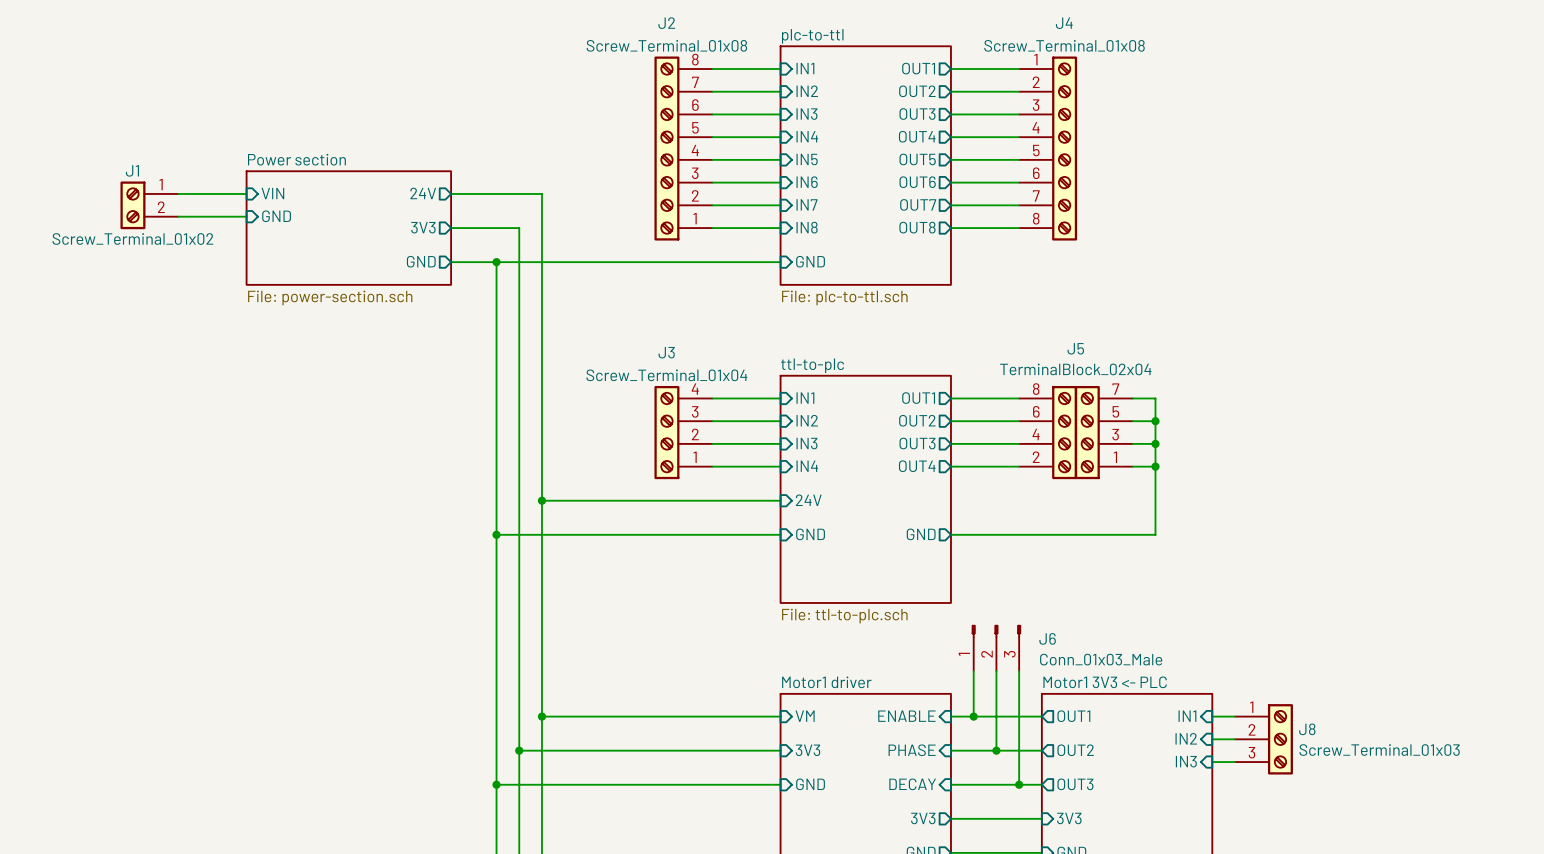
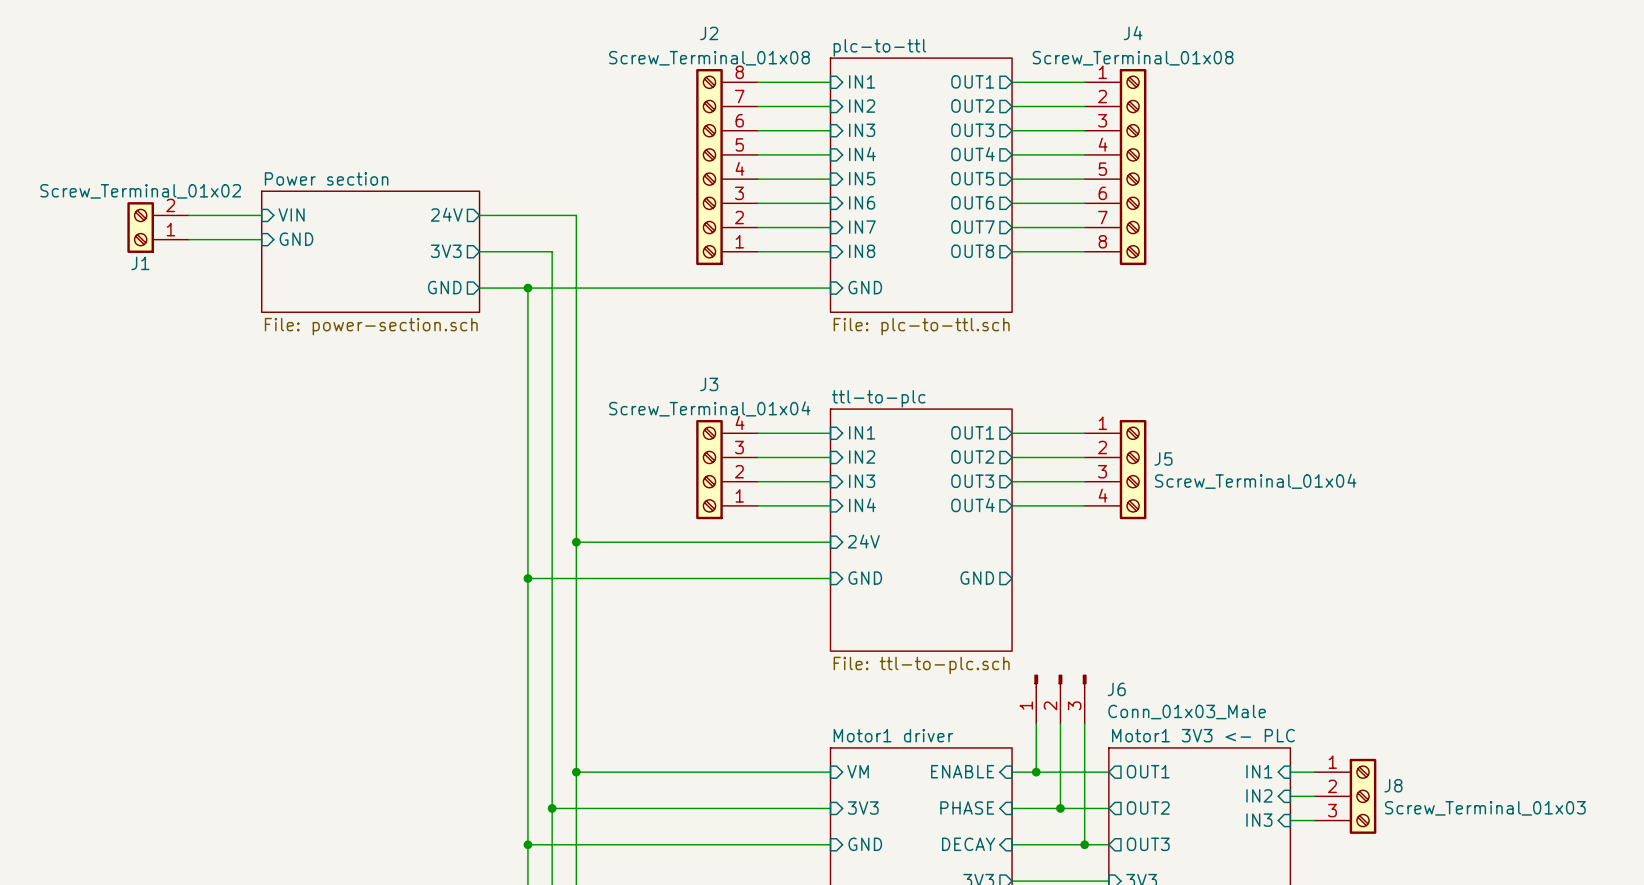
J1 flip: as is (132, 205) -> up-down (140, 227)
J5 name position: J5 (1075, 348) -> J5 (1163, 458)
J5 value: TerminalBlock_02x04 (1075, 369) -> Screw_Terminal_01x04 (1255, 481)
J5 symbol: [1019, 385, 1133, 480] -> [1084, 419, 1147, 520]
wire: (1132, 398) (1155, 398) (1155, 534) (950, 534) -> none
wire: (1132, 421) (1155, 421) -> none
junction: (1155, 421) -> none
wire: (1132, 443) (1155, 443) -> none
junction: (1155, 443) -> none
wire: (1132, 466) (1155, 466) -> none
junction: (1155, 466) -> none

